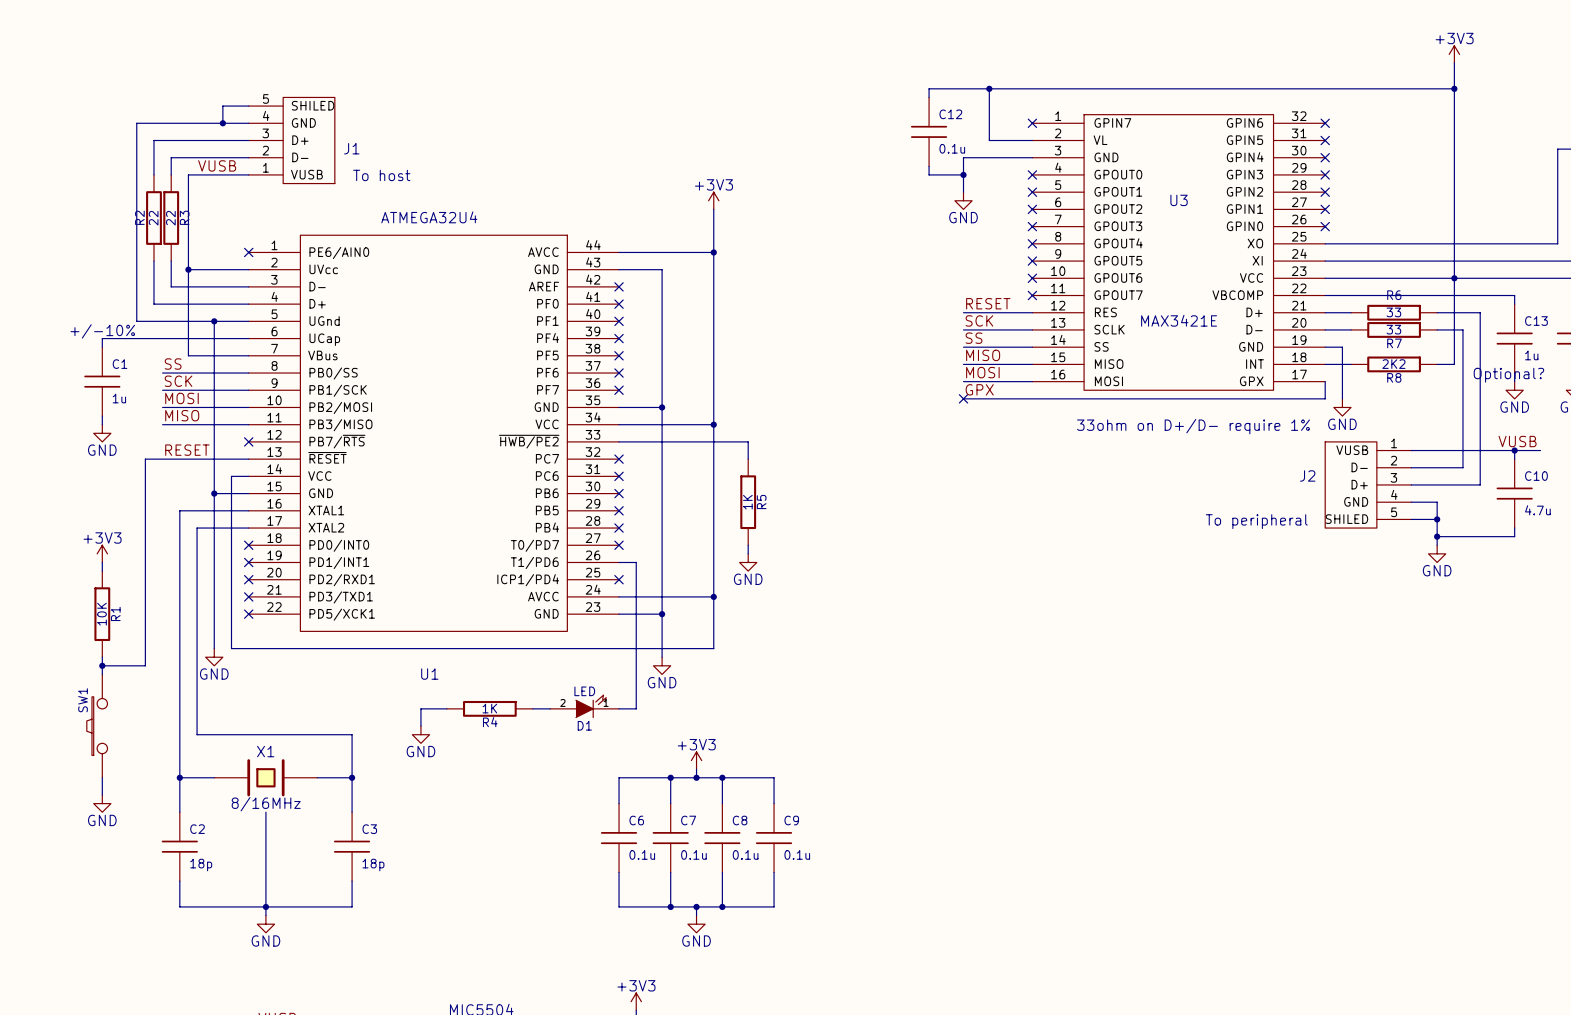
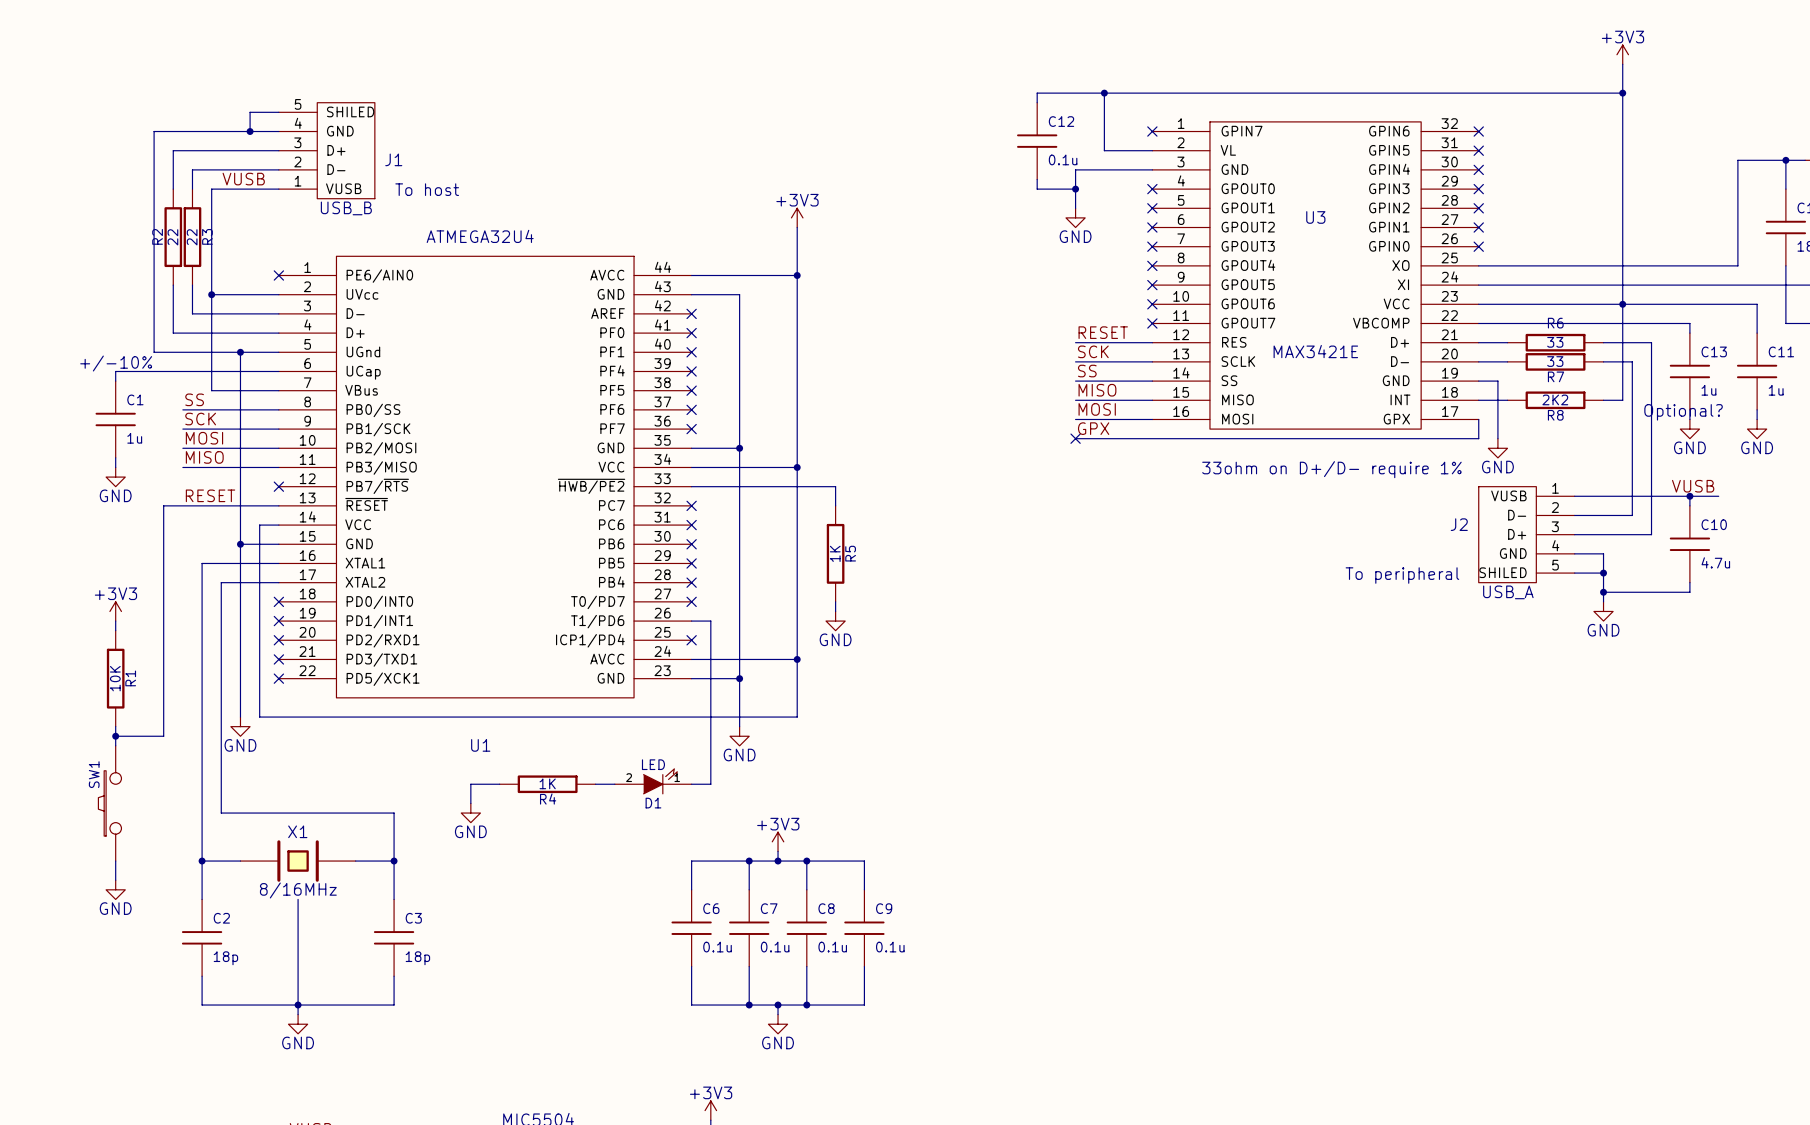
J1 value: none -> USB_B (346, 208)
J2 value: none -> USB_A (1508, 592)

